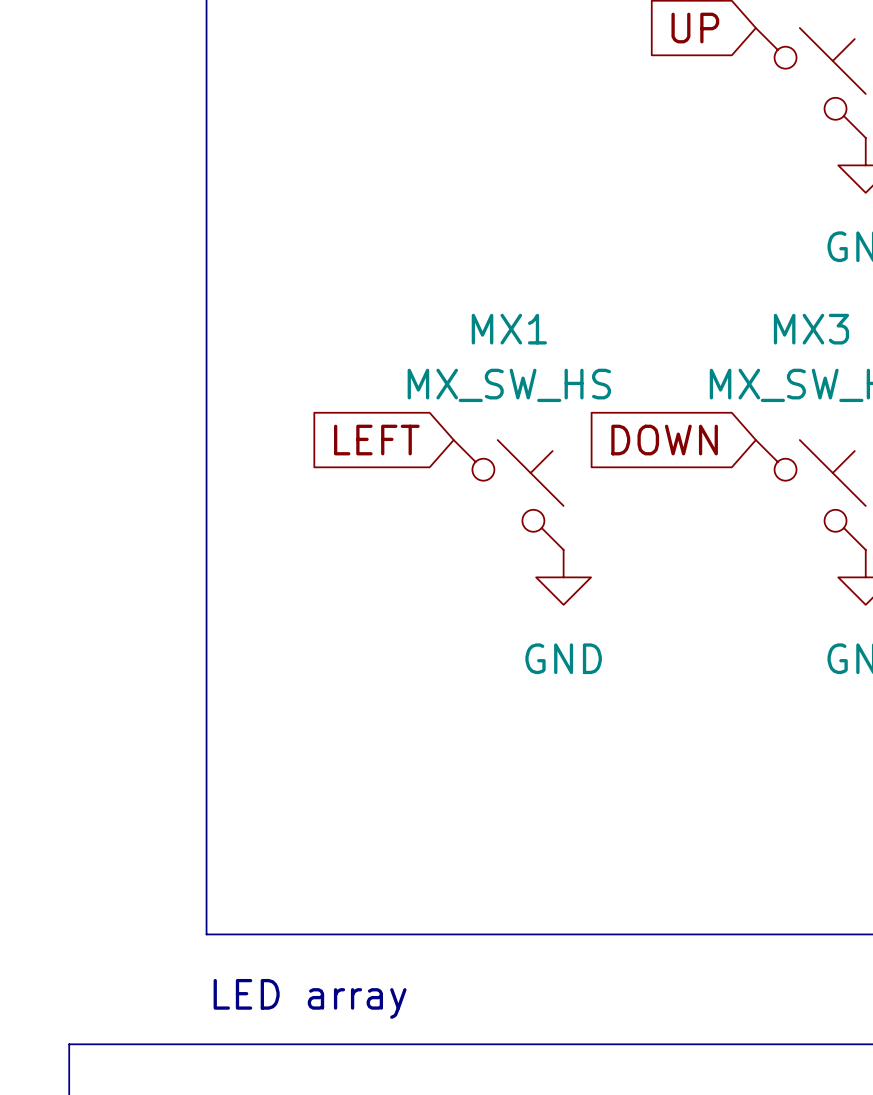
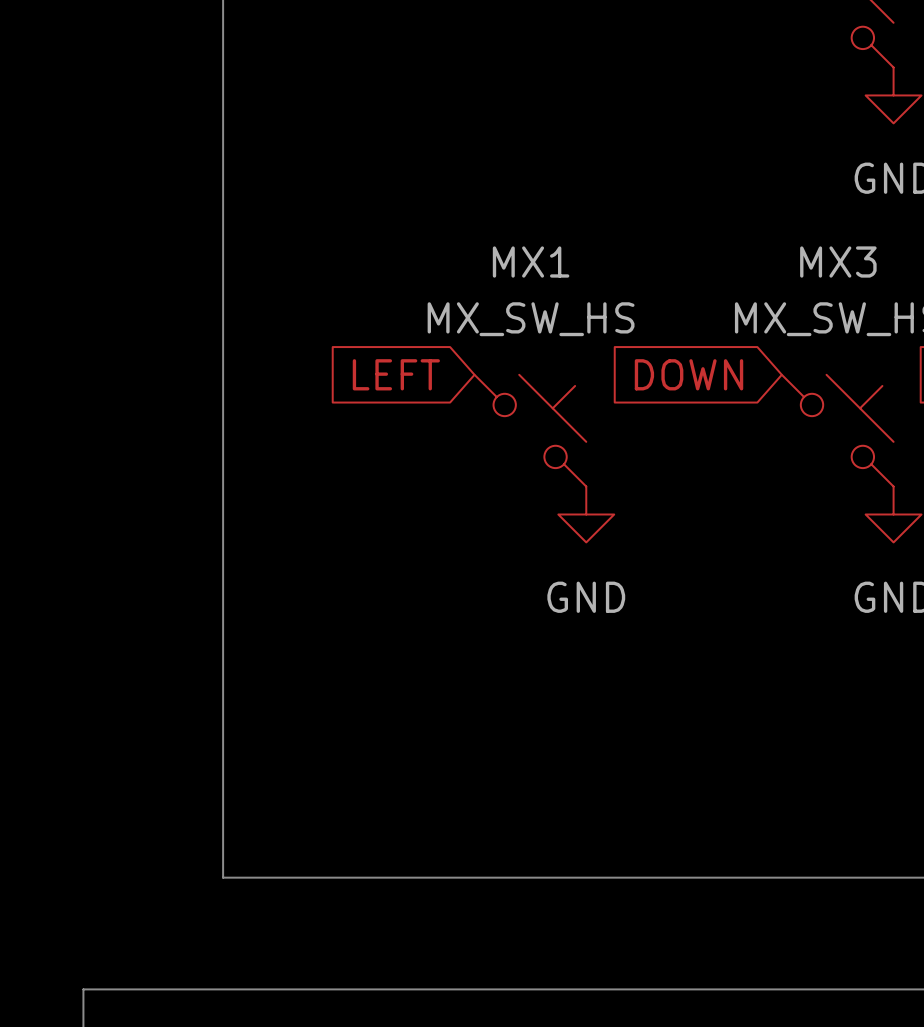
text: LED array (310, 998) -> none

